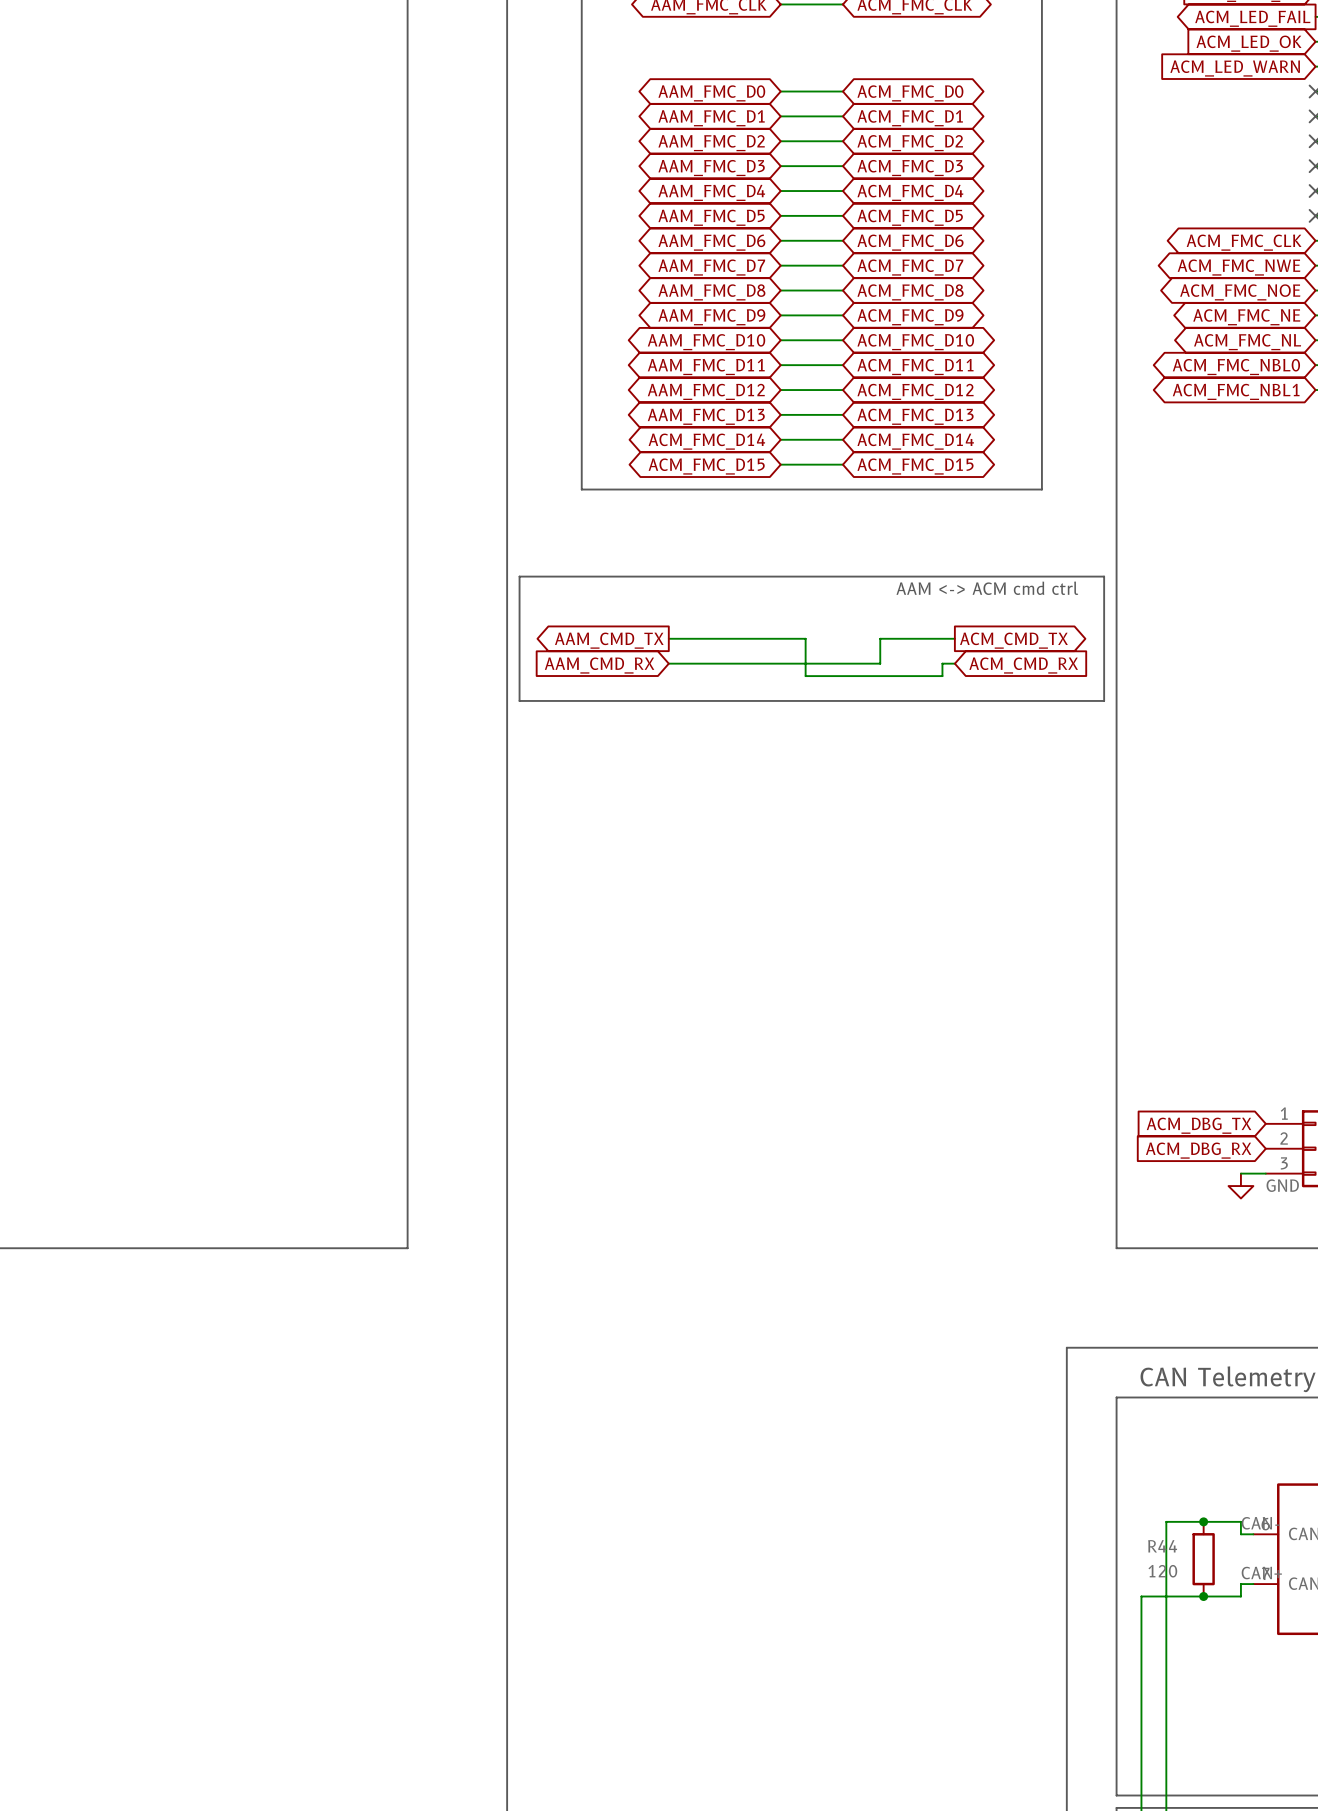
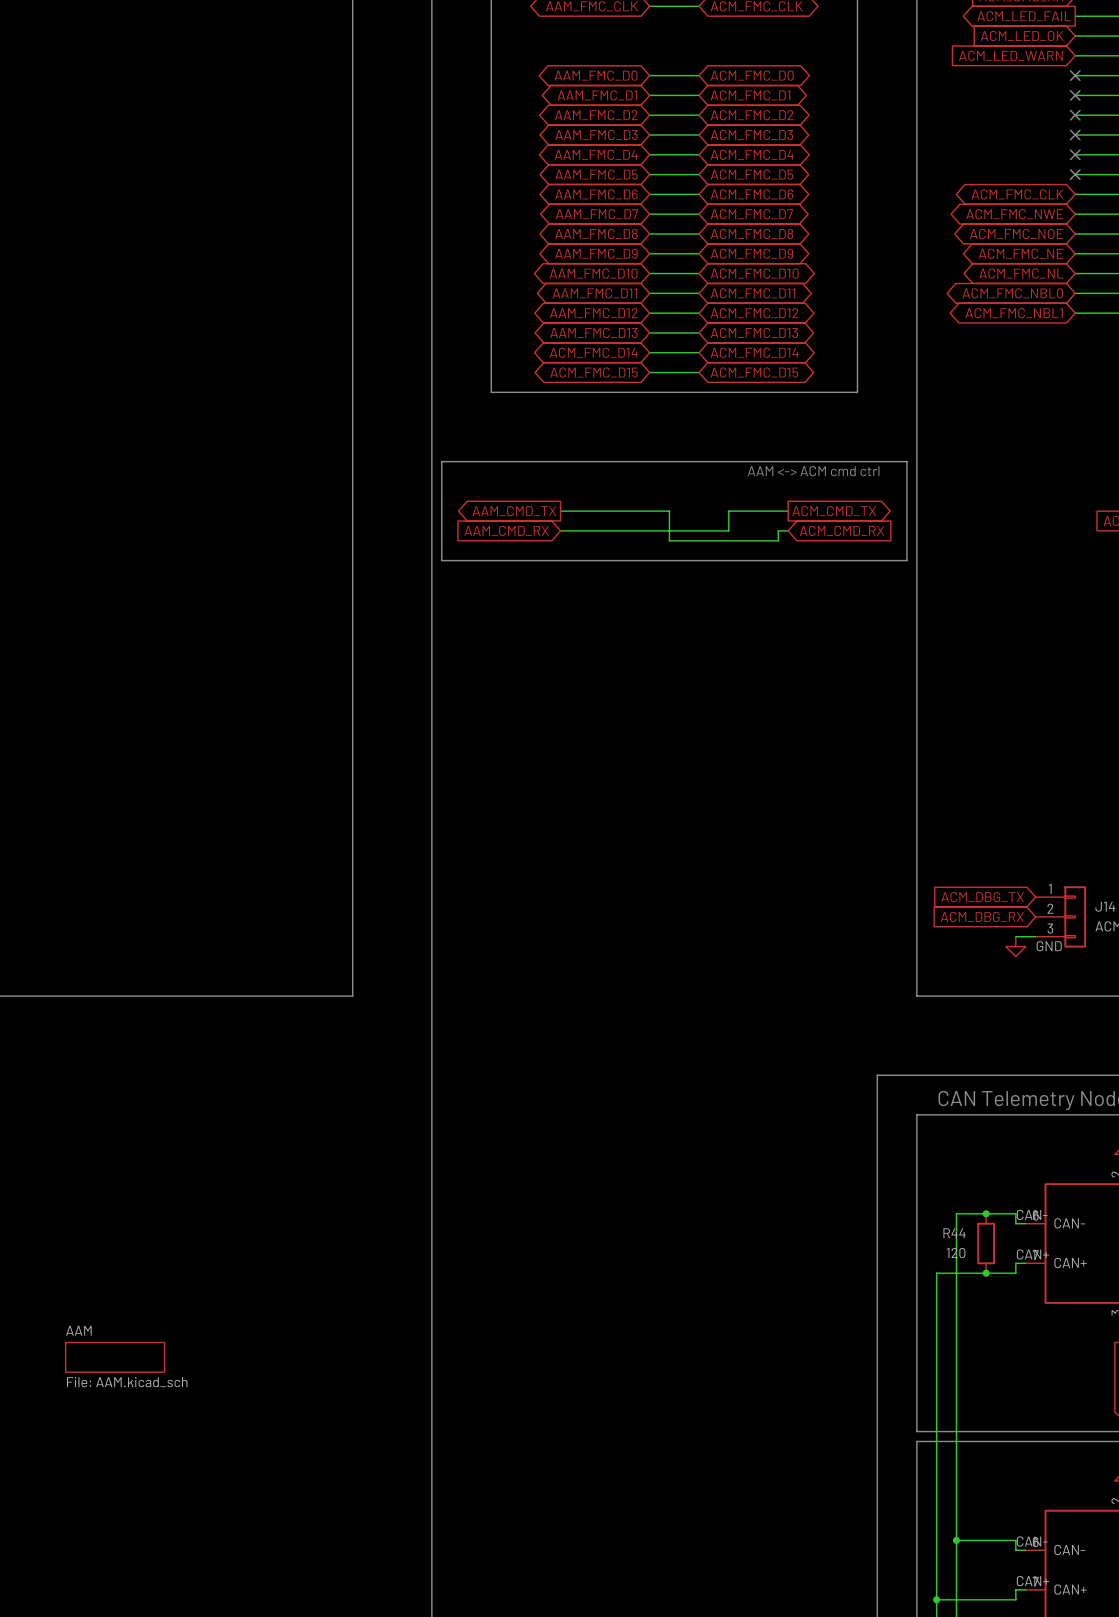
sheet AAM: none -> File: AAM.kicad_sch (115, 1357)

